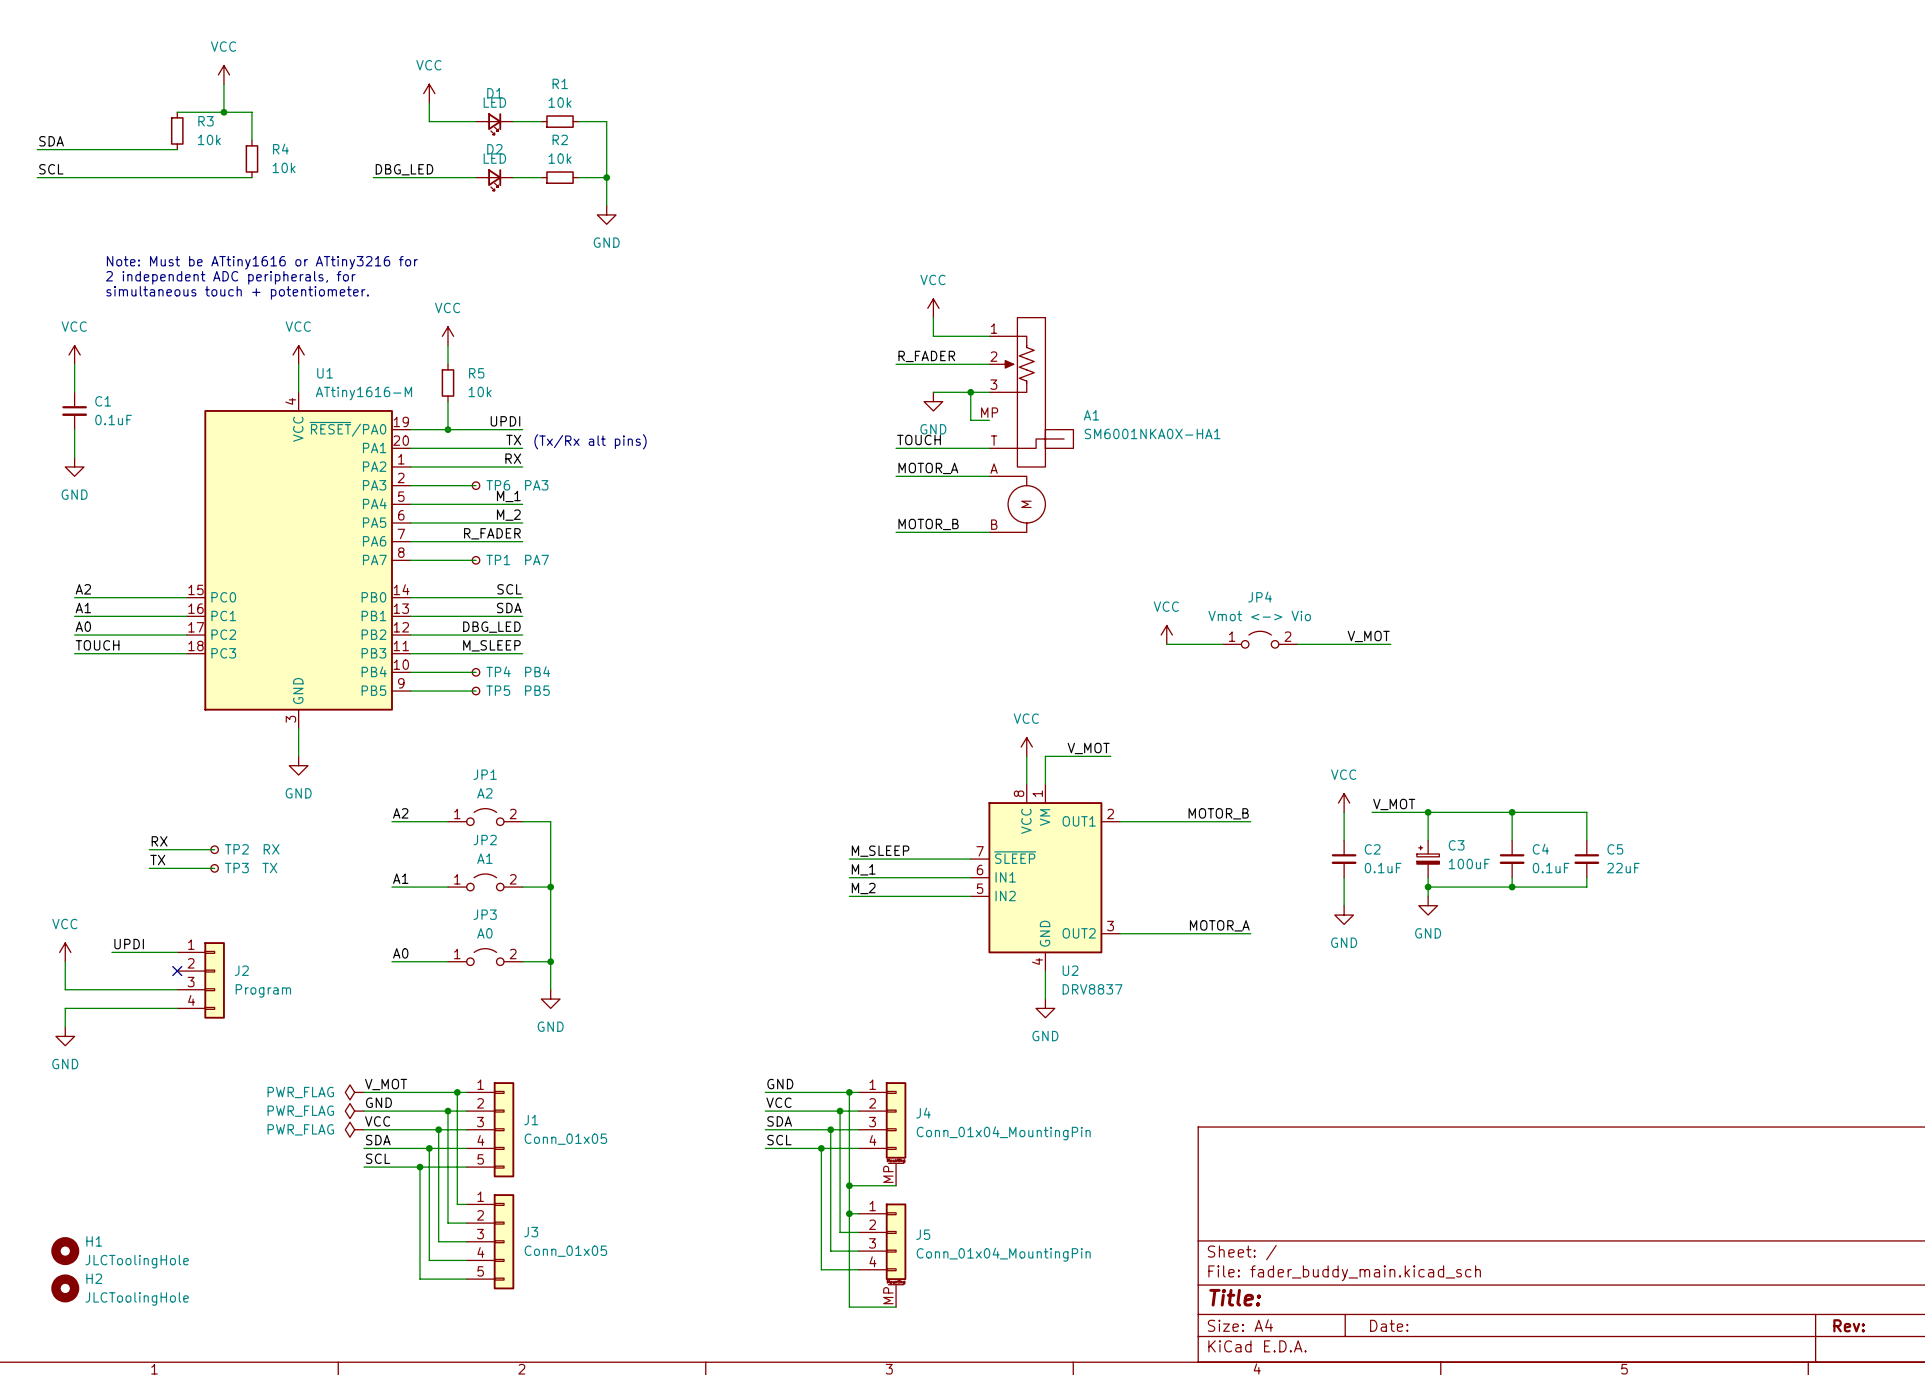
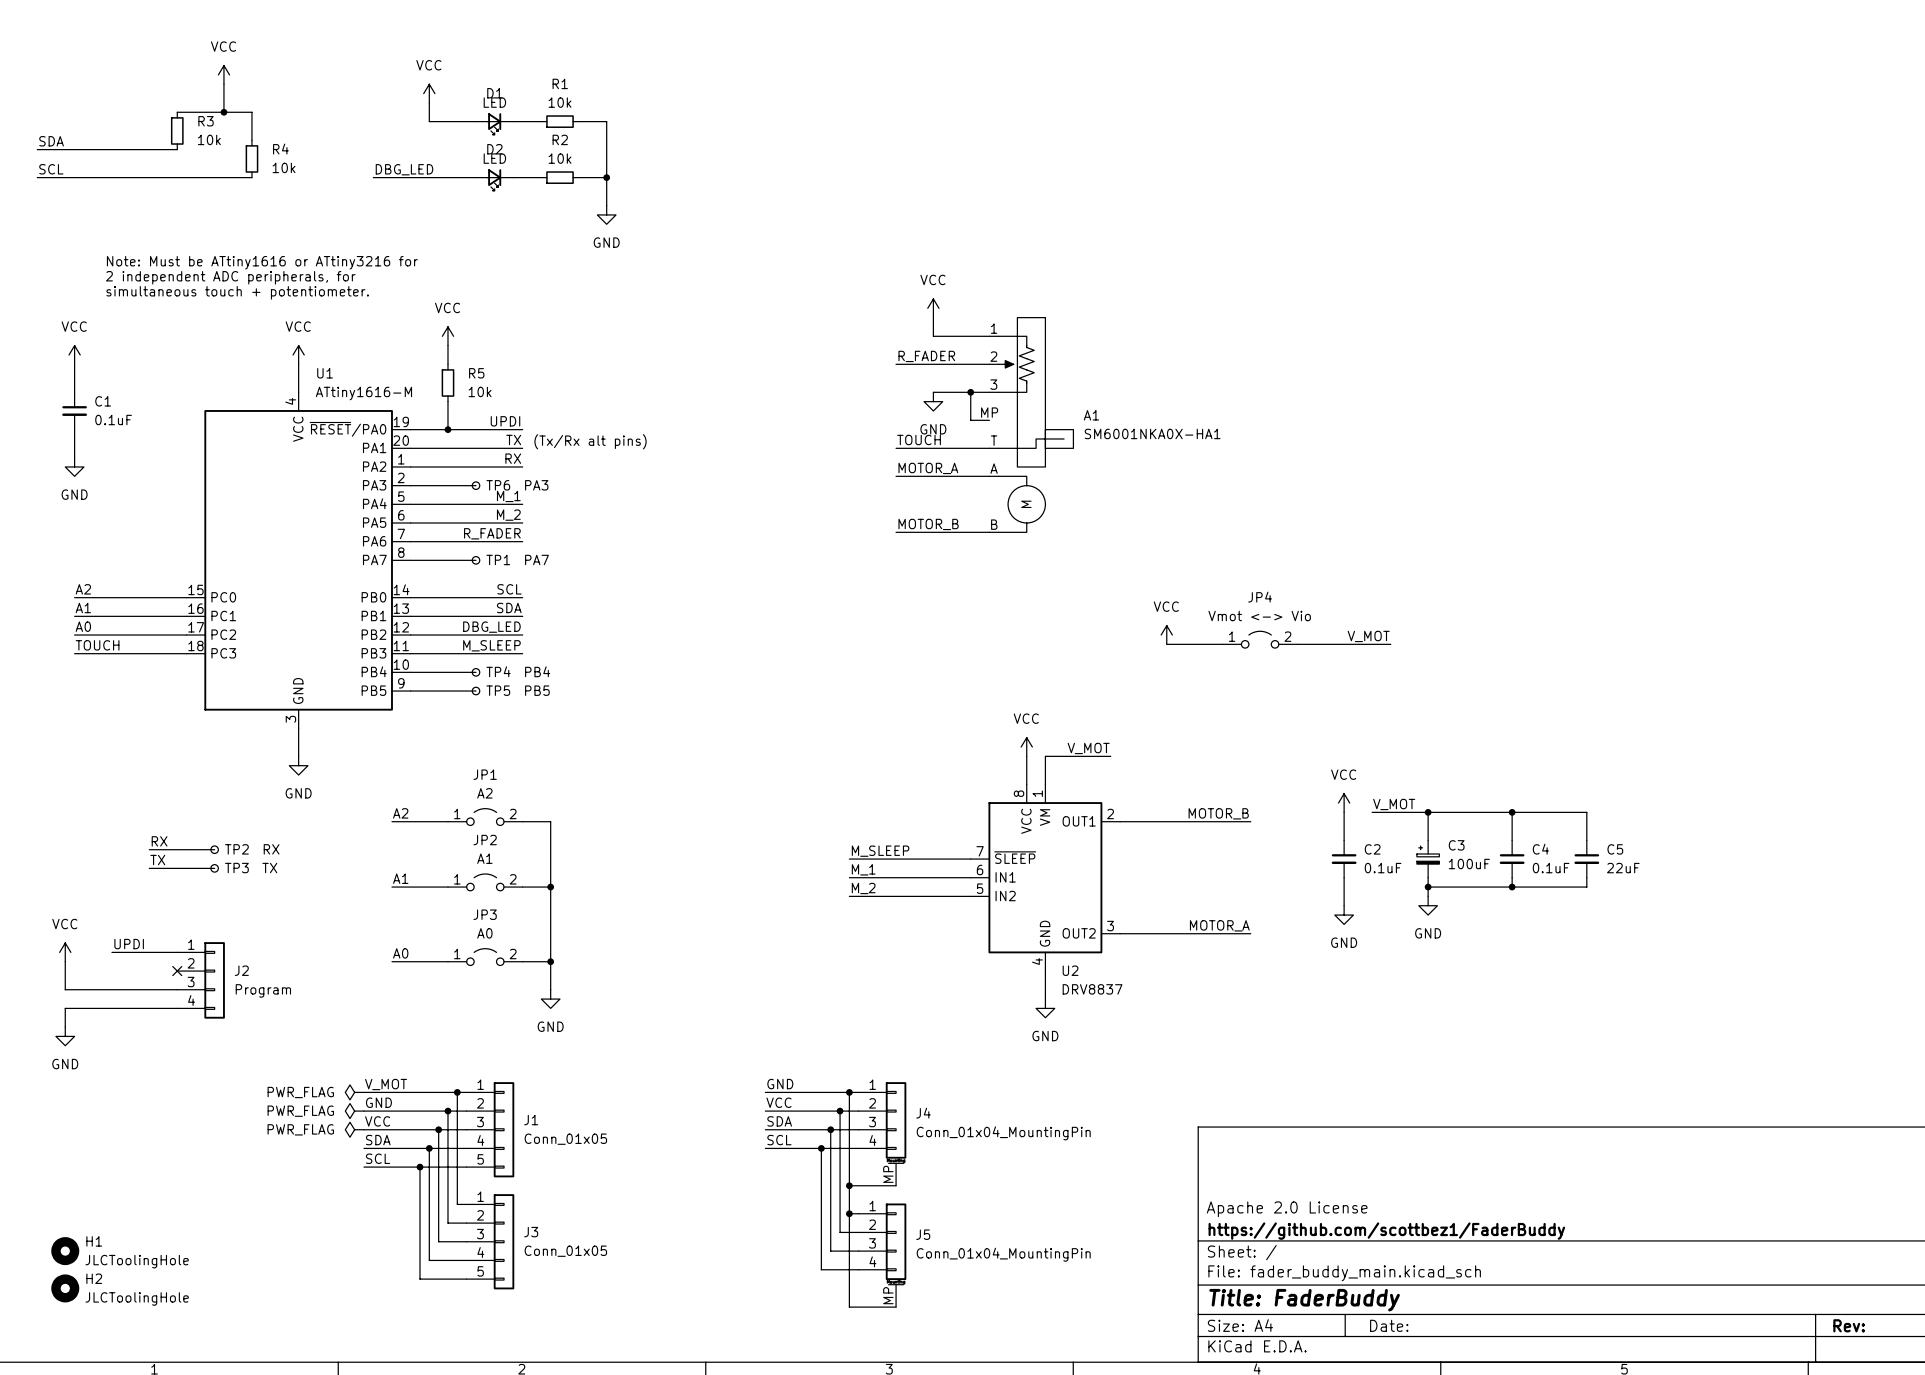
title block: none -> Apache 2.0 License (1287, 1209)
title block: none -> https://github.com/scottbez1/FaderBuddy (1386, 1231)
title block: Title: (1235, 1297) -> Title: FaderBuddy (1304, 1300)

